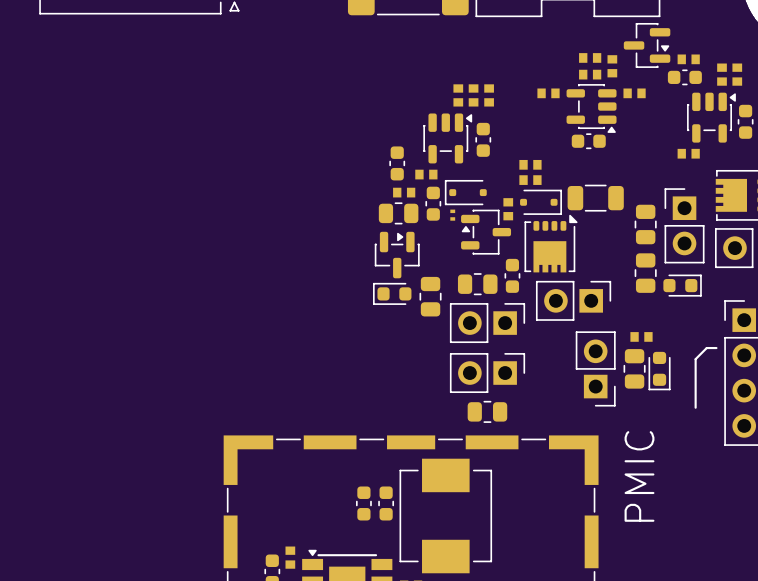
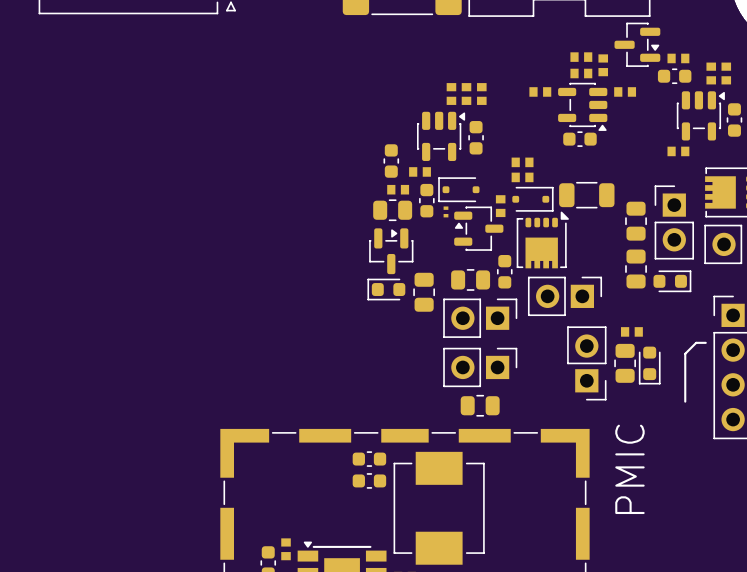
part: none -> (369, 459)
part: none -> (369, 480)
part: (363, 503) -> none
part: (386, 503) -> none

